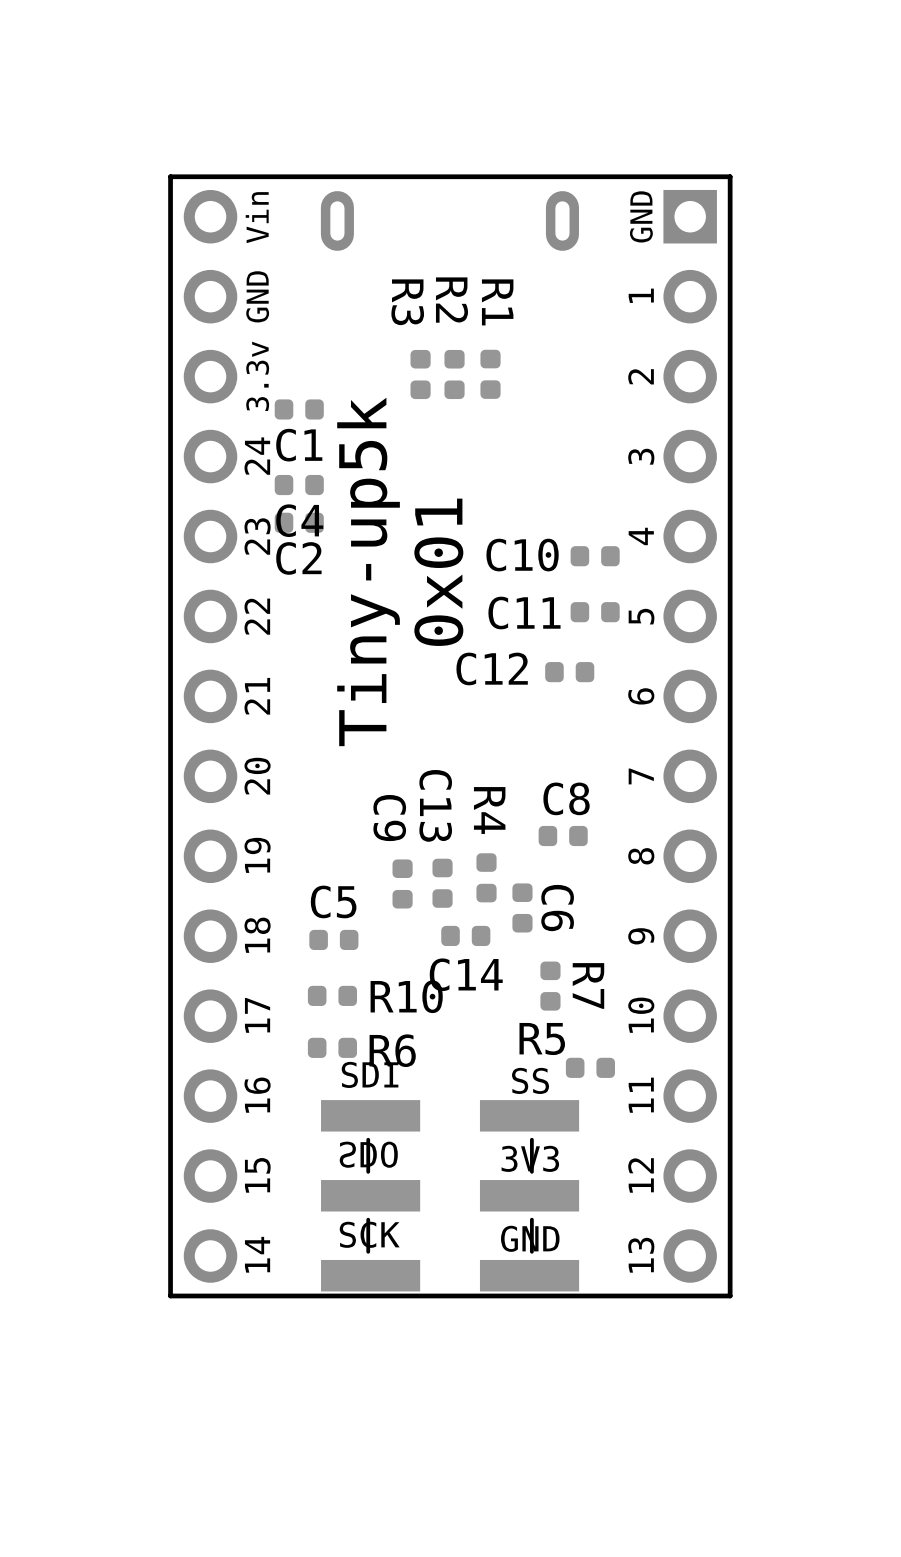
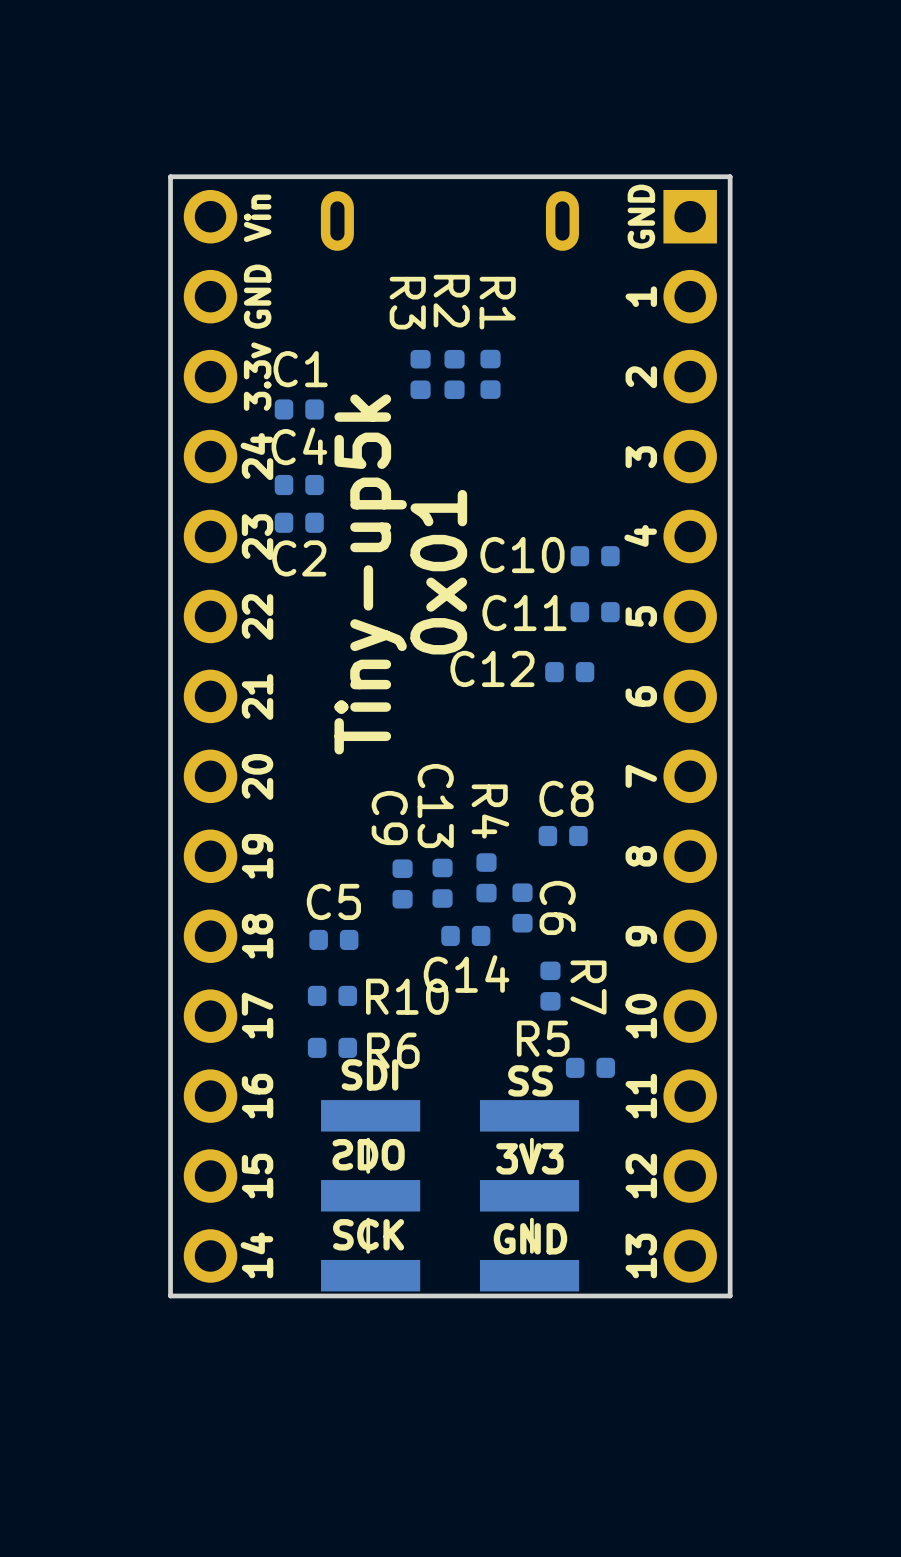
C1 name position: C1 (299, 445) -> C1 (300, 369)
C4 name position: C4 (299, 520) -> C4 (299, 446)

